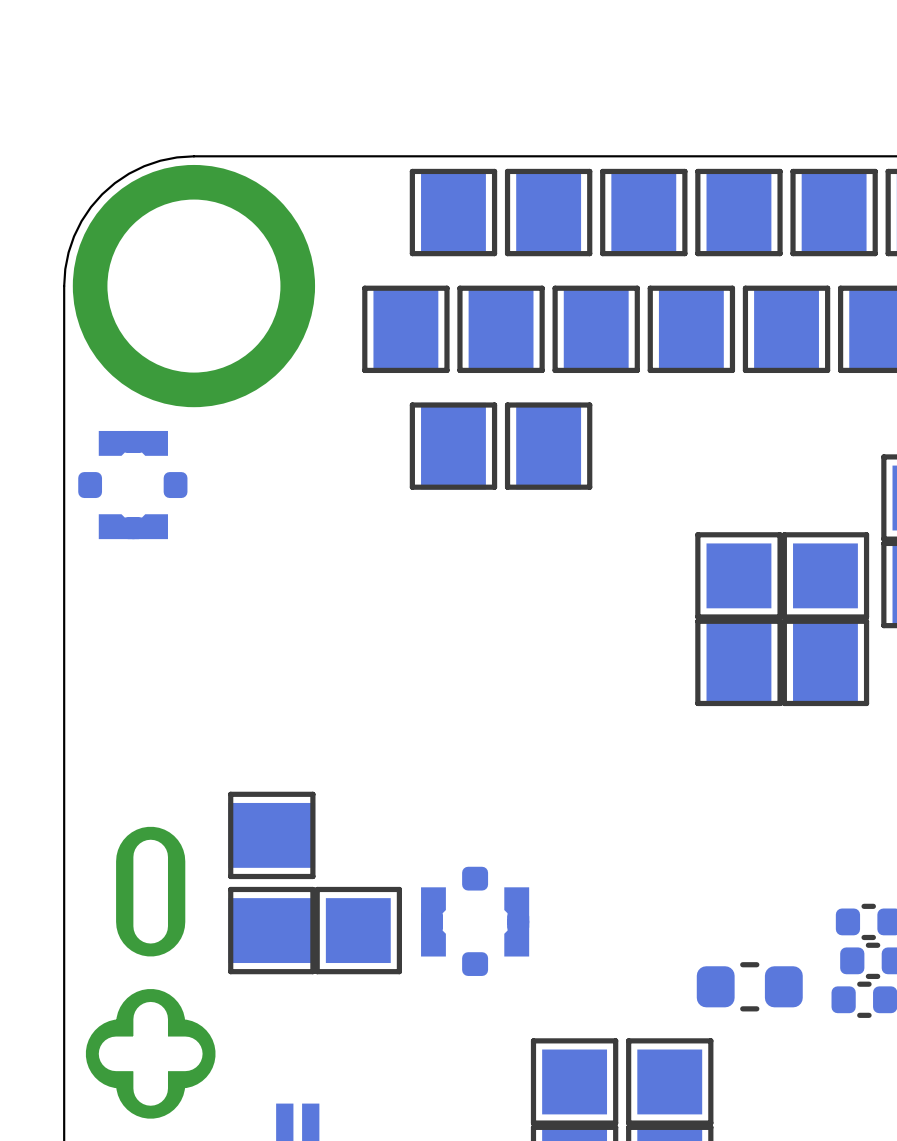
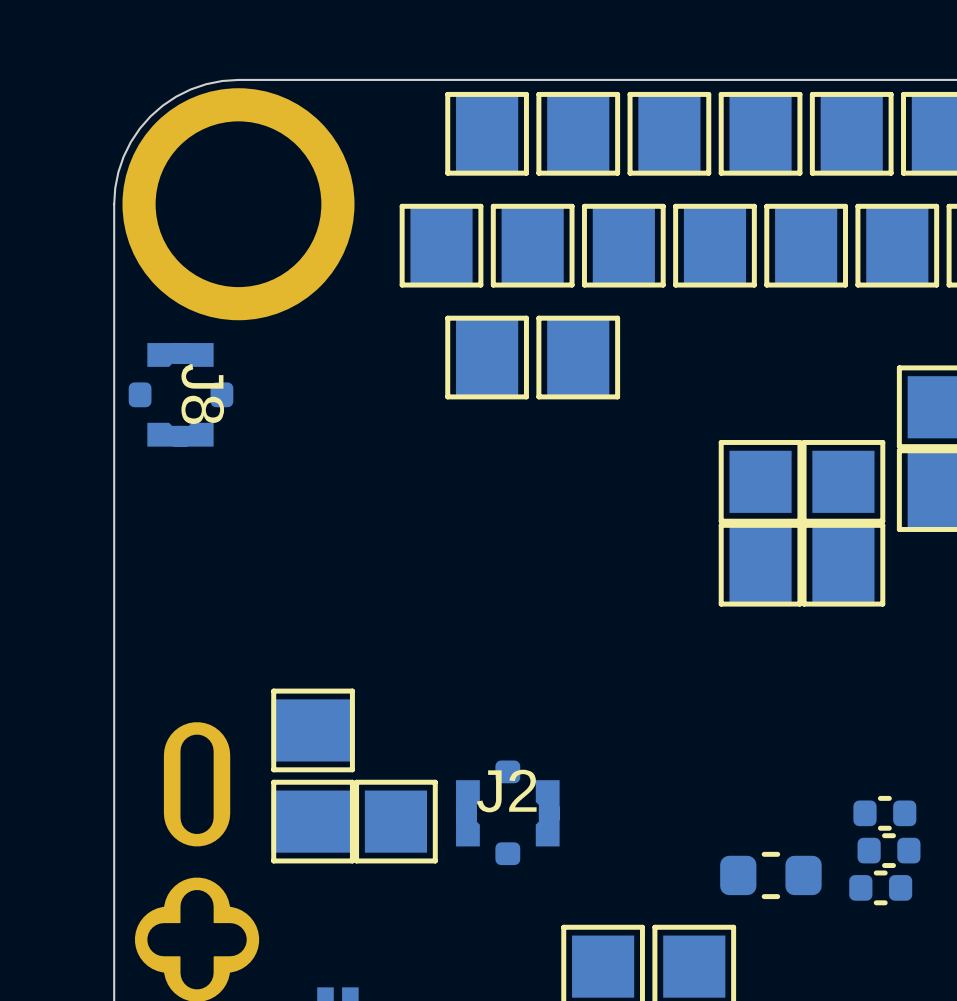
part: (132, 485) -> none
J8: none -> (181, 394)
J2 name: none -> J2 (506, 791)

